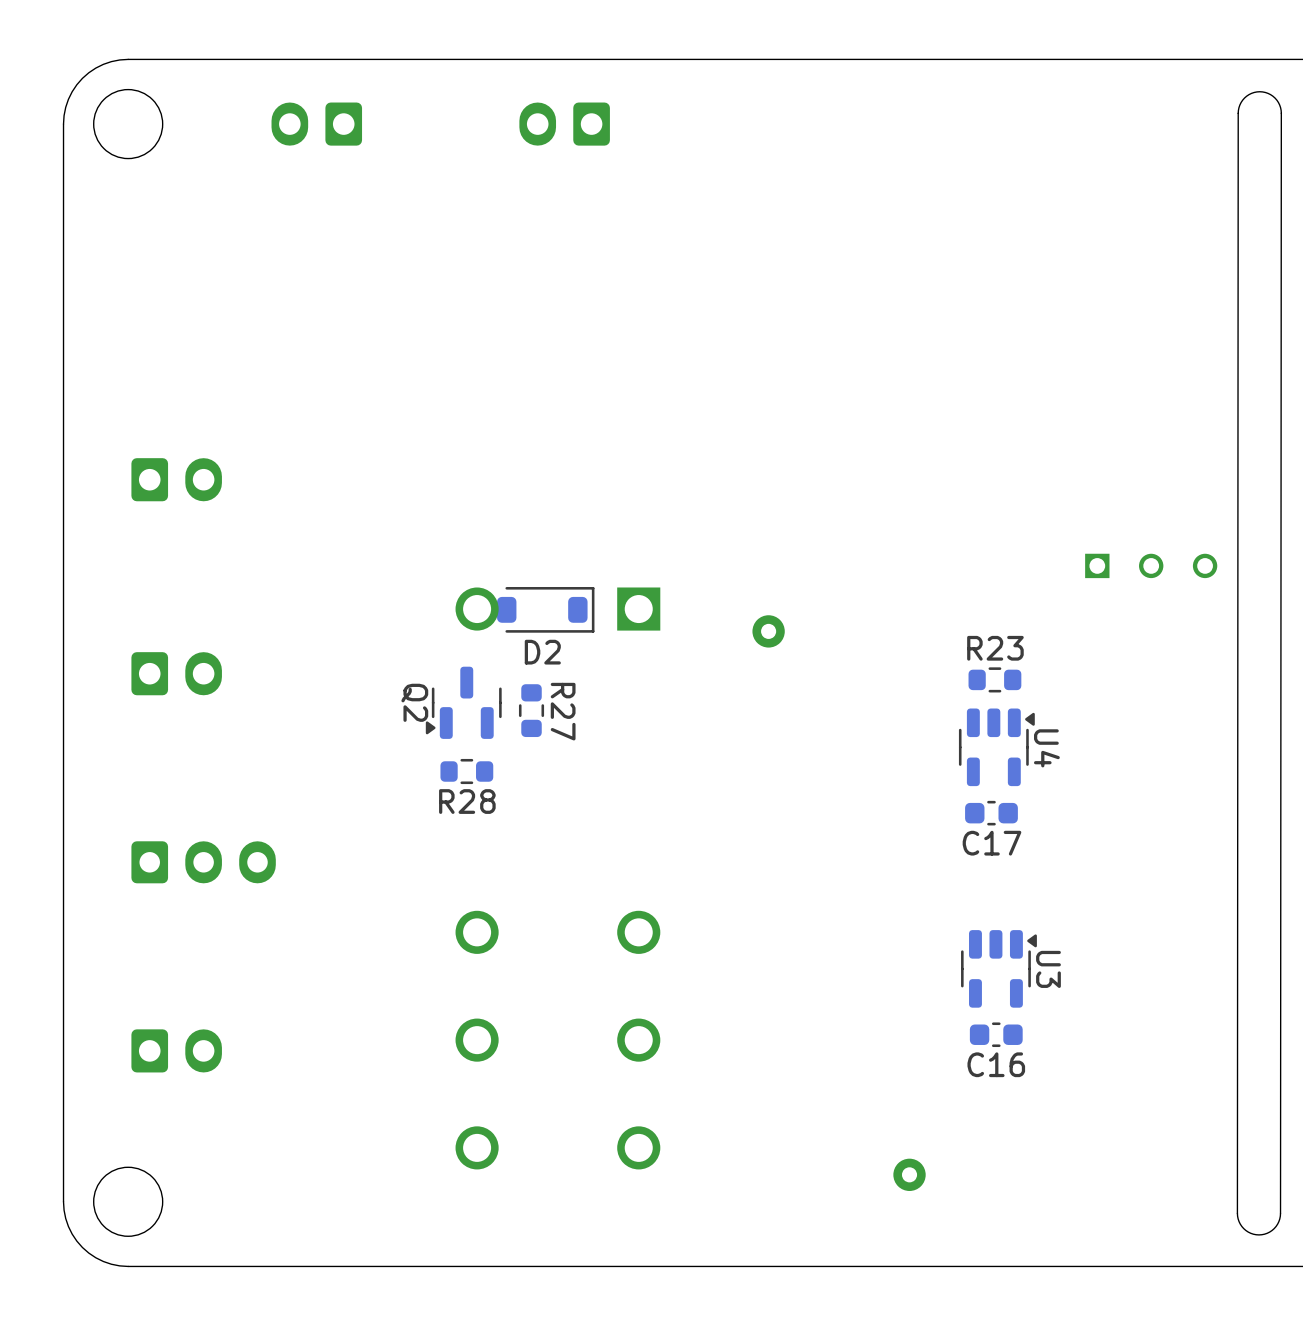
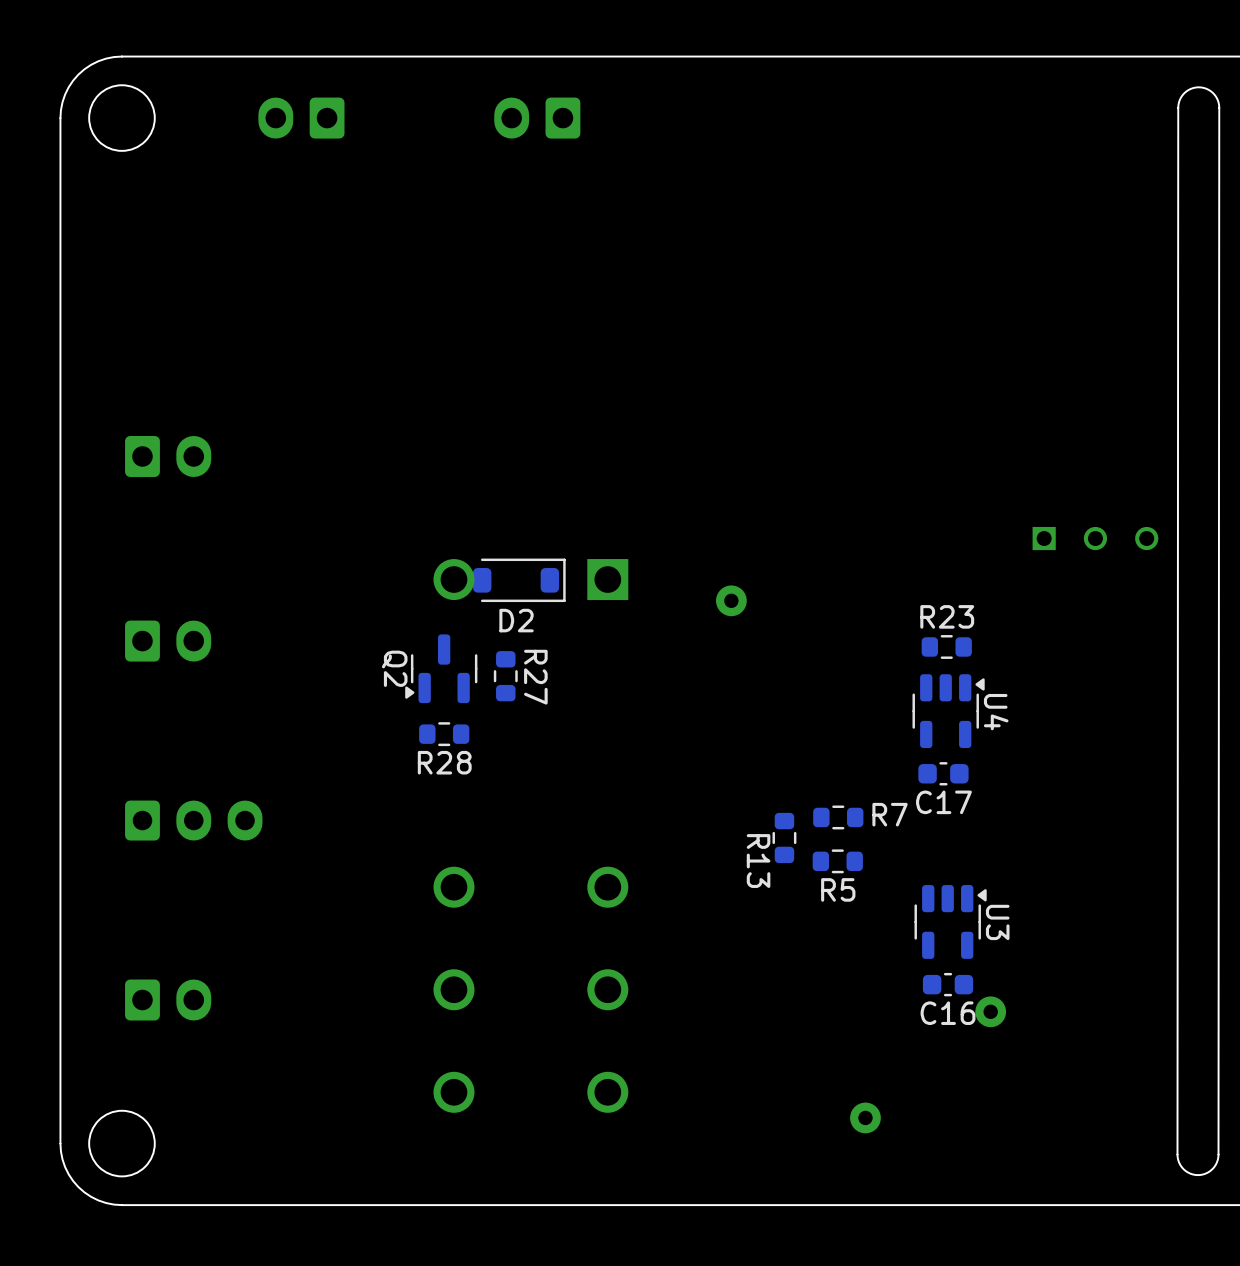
R7: none -> (838, 817)
R13: none -> (784, 837)
R5: none -> (837, 861)
part: none -> (990, 1011)

